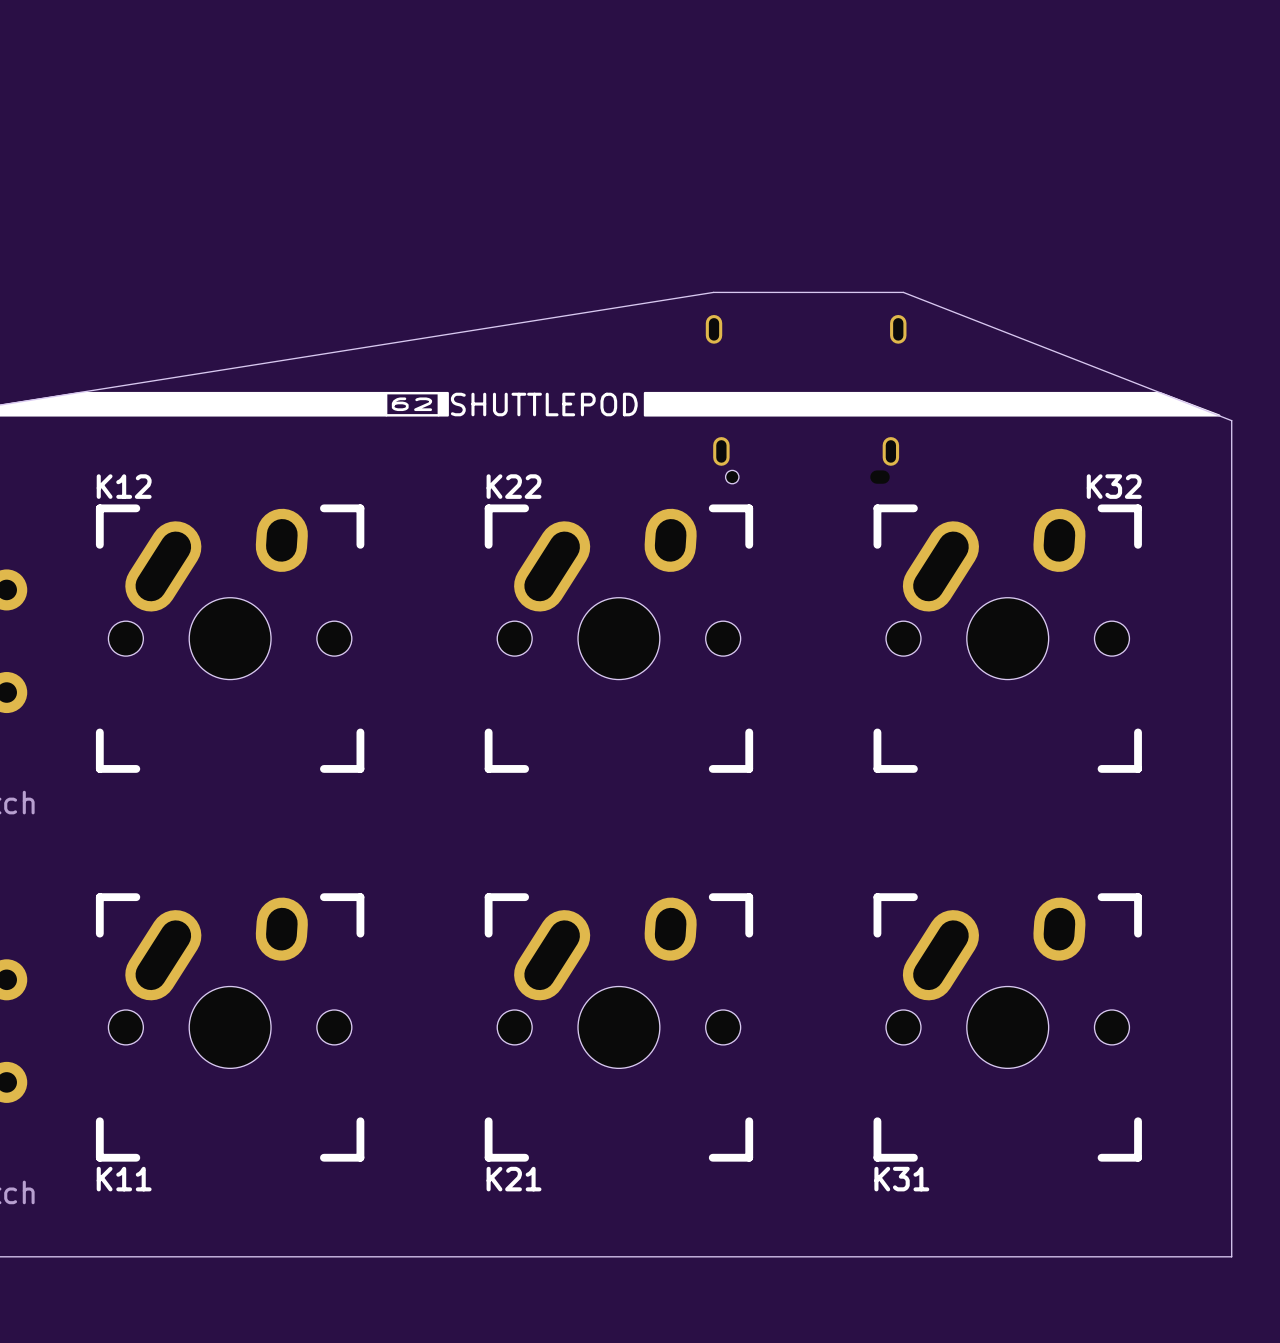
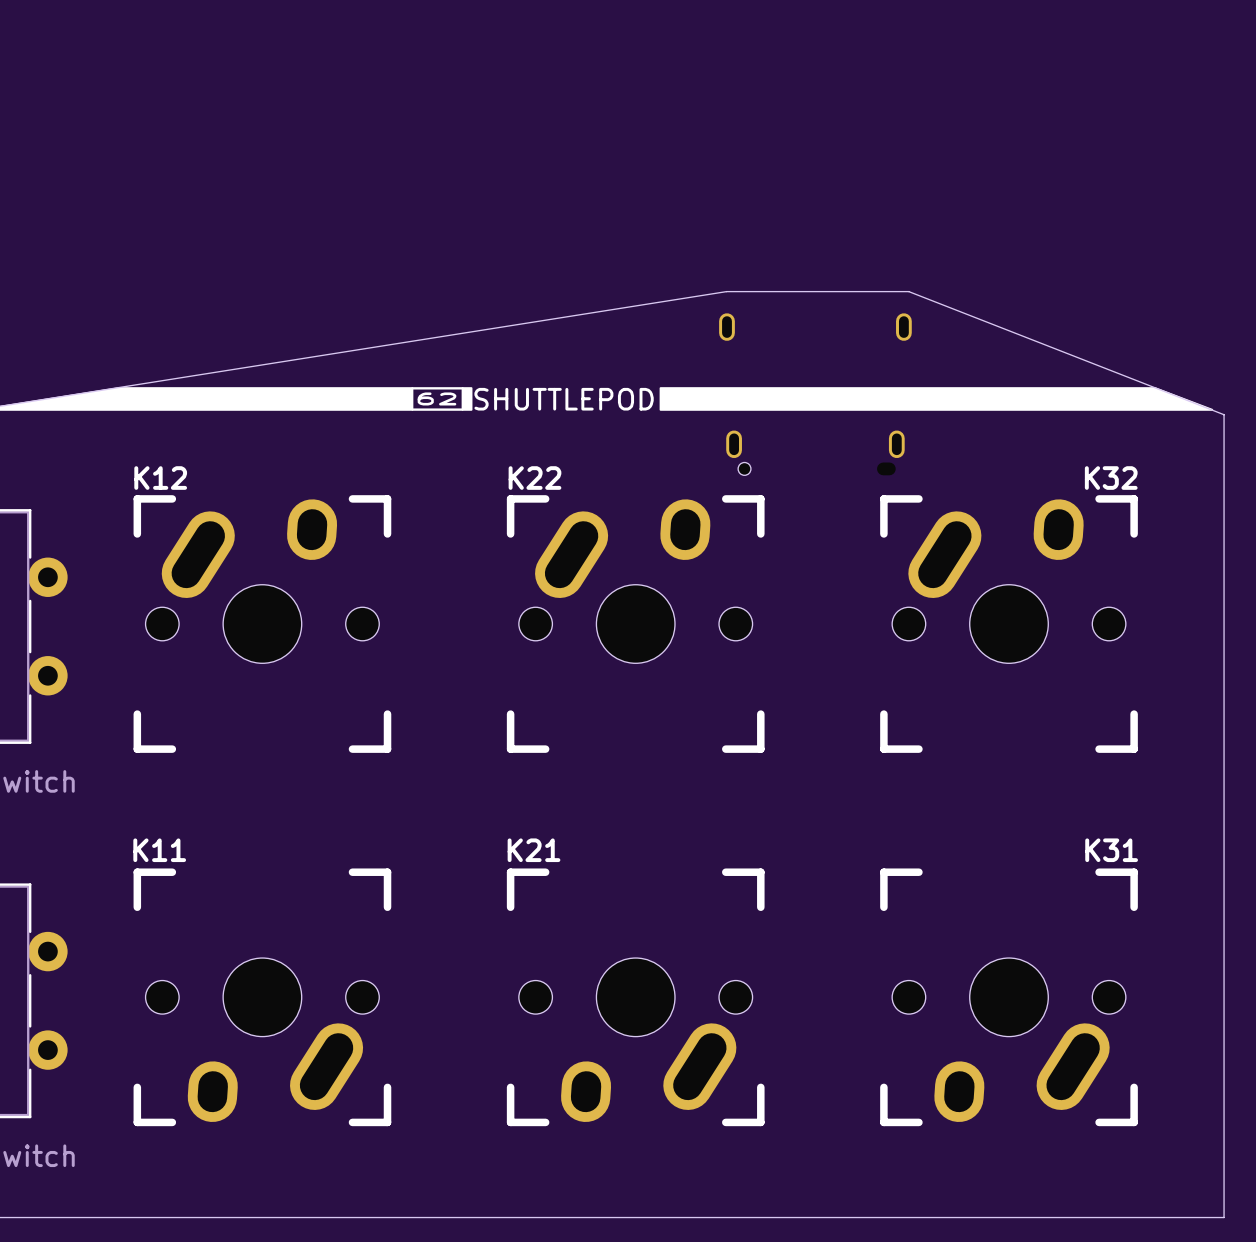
K11 rotation: 0° (230, 1027) -> 180° (262, 997)
K21 rotation: 0° (618, 1027) -> 180° (635, 997)
K31 rotation: 0° (1007, 1027) -> 180° (1009, 997)
K11 name position: K11 (124, 1179) -> K11 (159, 850)
K21 name position: K21 (514, 1179) -> K21 (534, 850)

